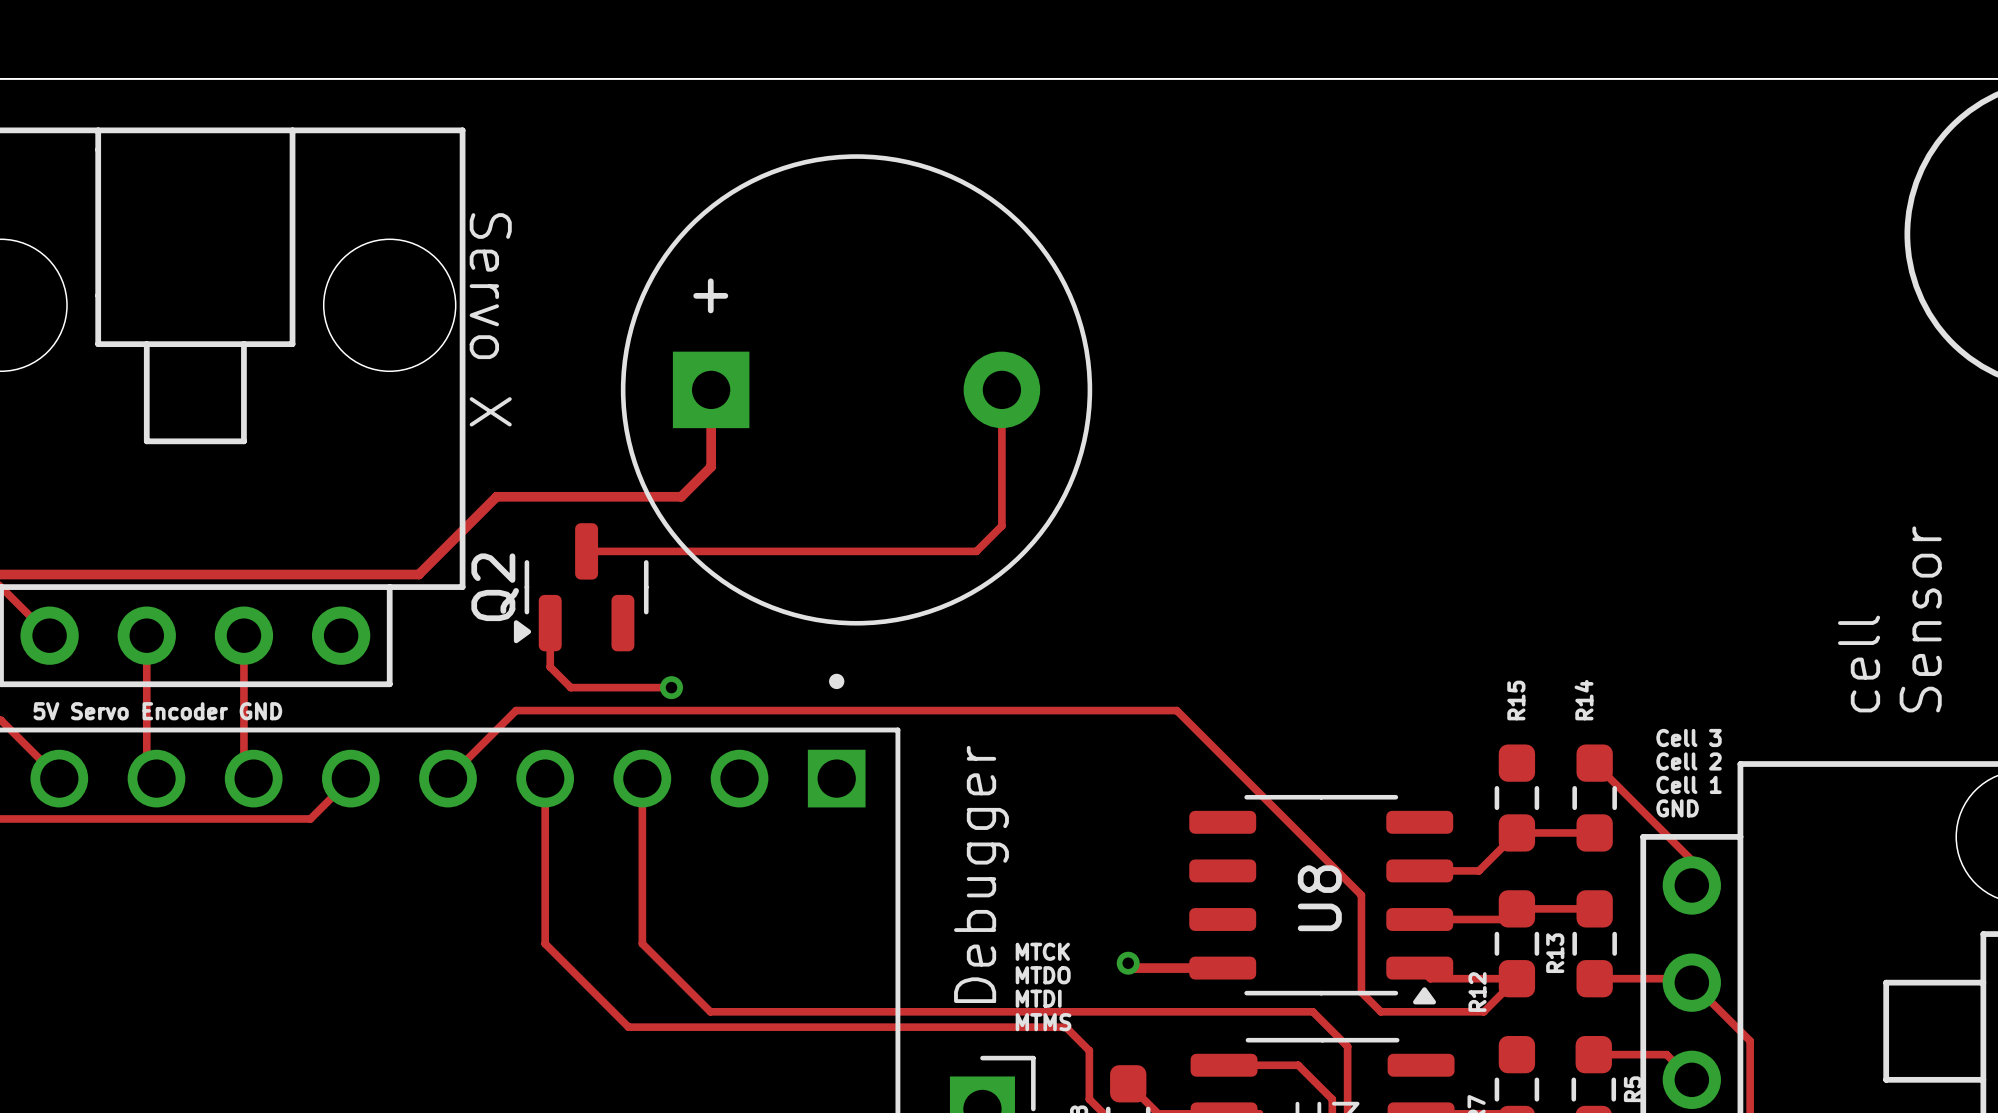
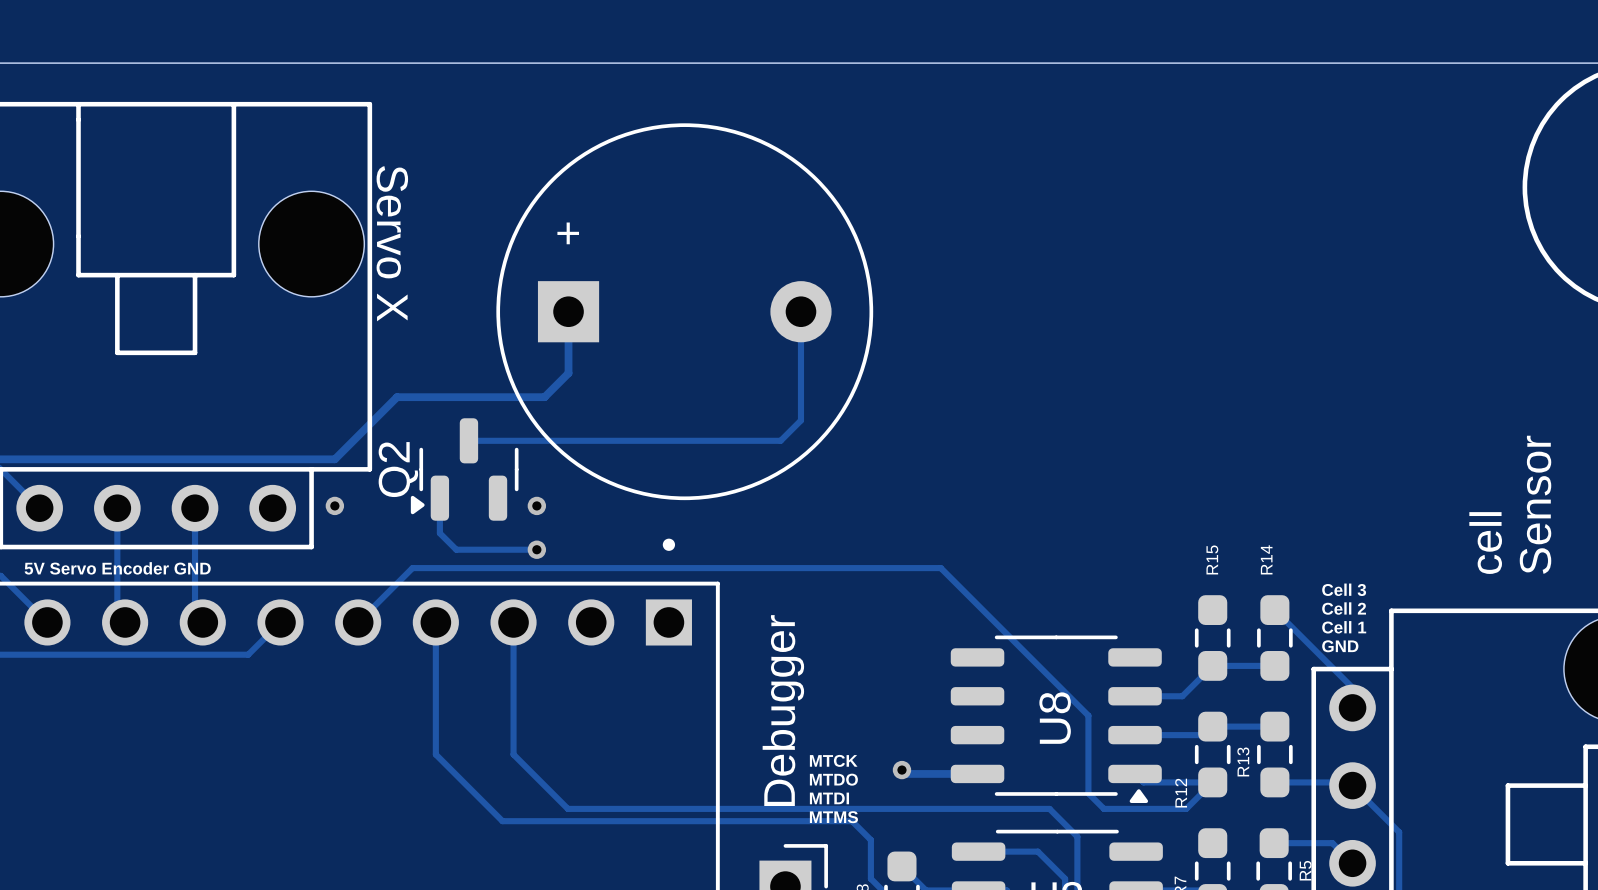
via: none -> (334, 505)
via: none -> (536, 505)

